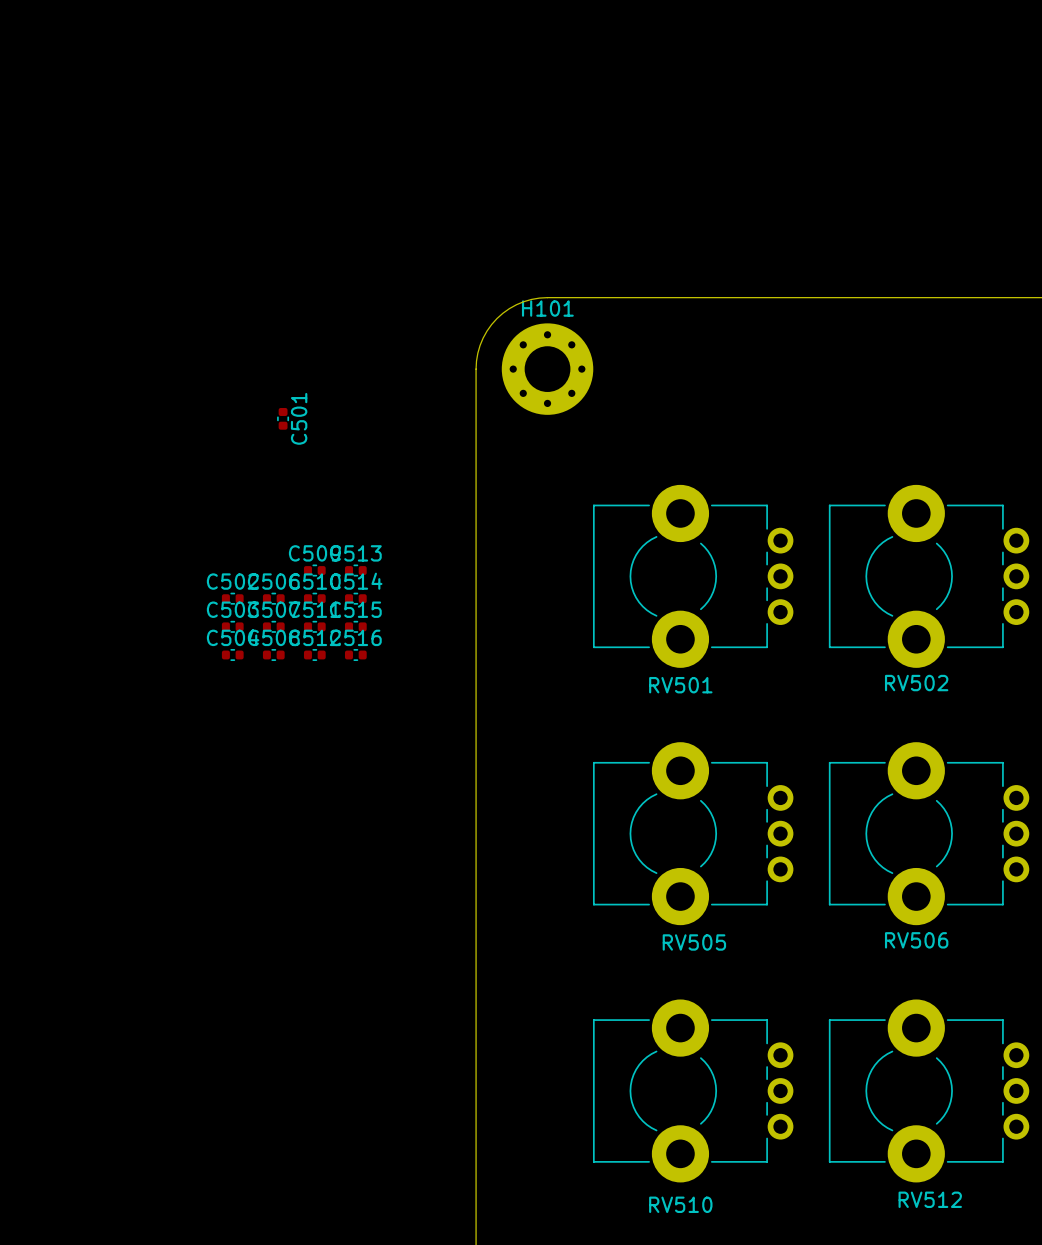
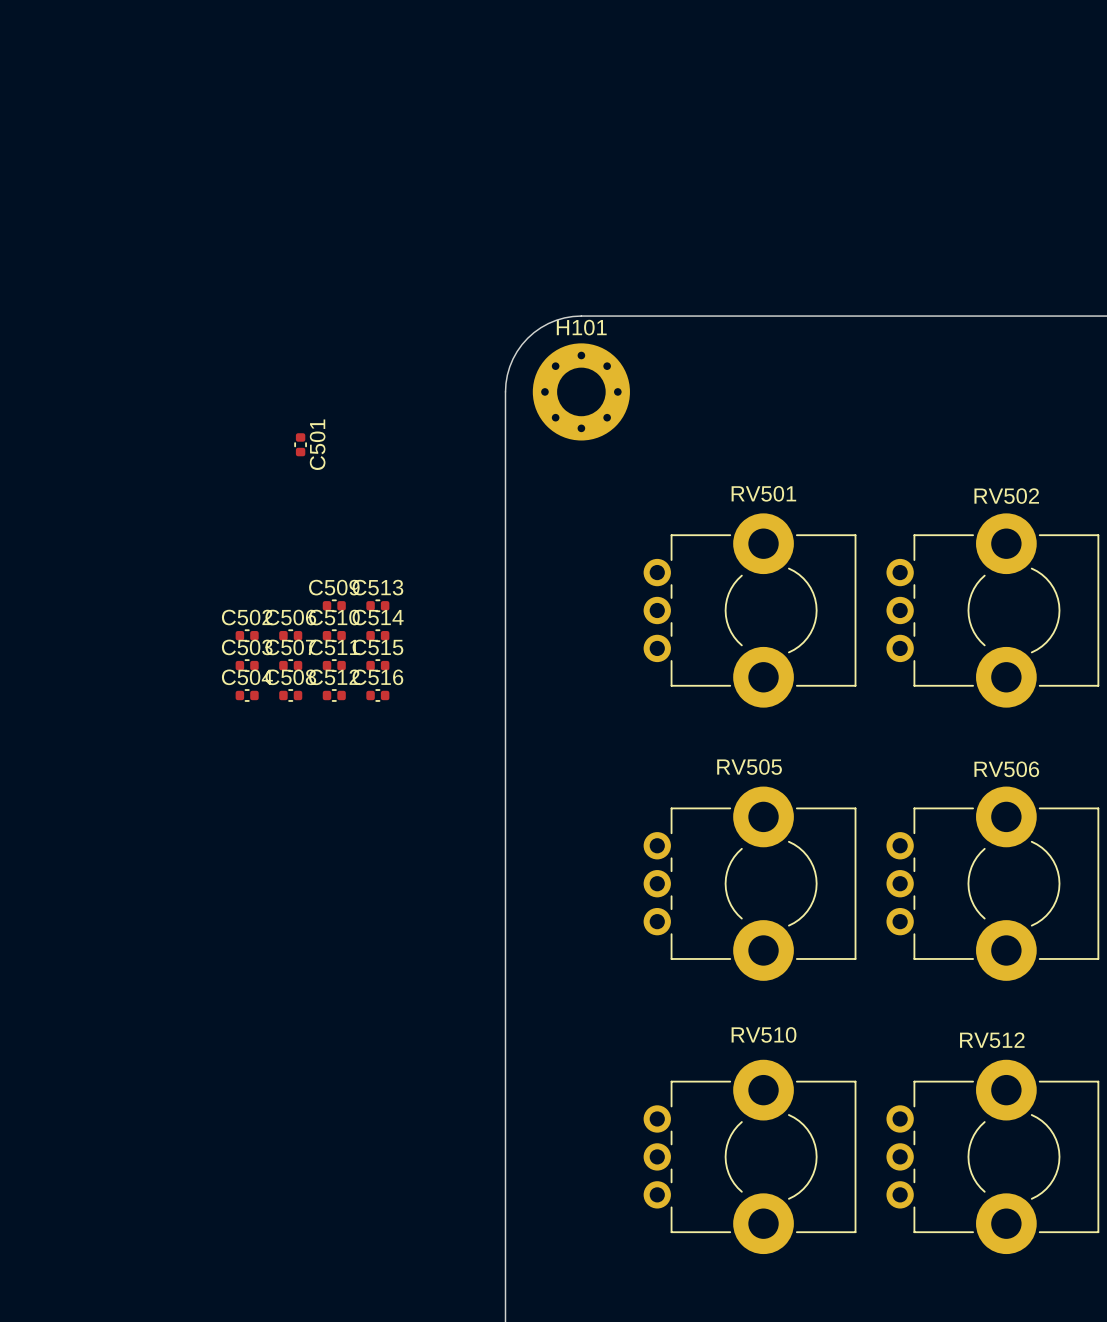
RV501 rotation: 0° (693, 576) -> 180° (750, 610)
RV502 rotation: 0° (929, 576) -> 180° (992, 610)
RV505 rotation: 0° (693, 833) -> 180° (750, 883)
RV506 rotation: 0° (929, 833) -> 180° (992, 883)
RV510 rotation: 0° (693, 1090) -> 180° (750, 1156)
RV512 rotation: 0° (929, 1090) -> 180° (992, 1156)

